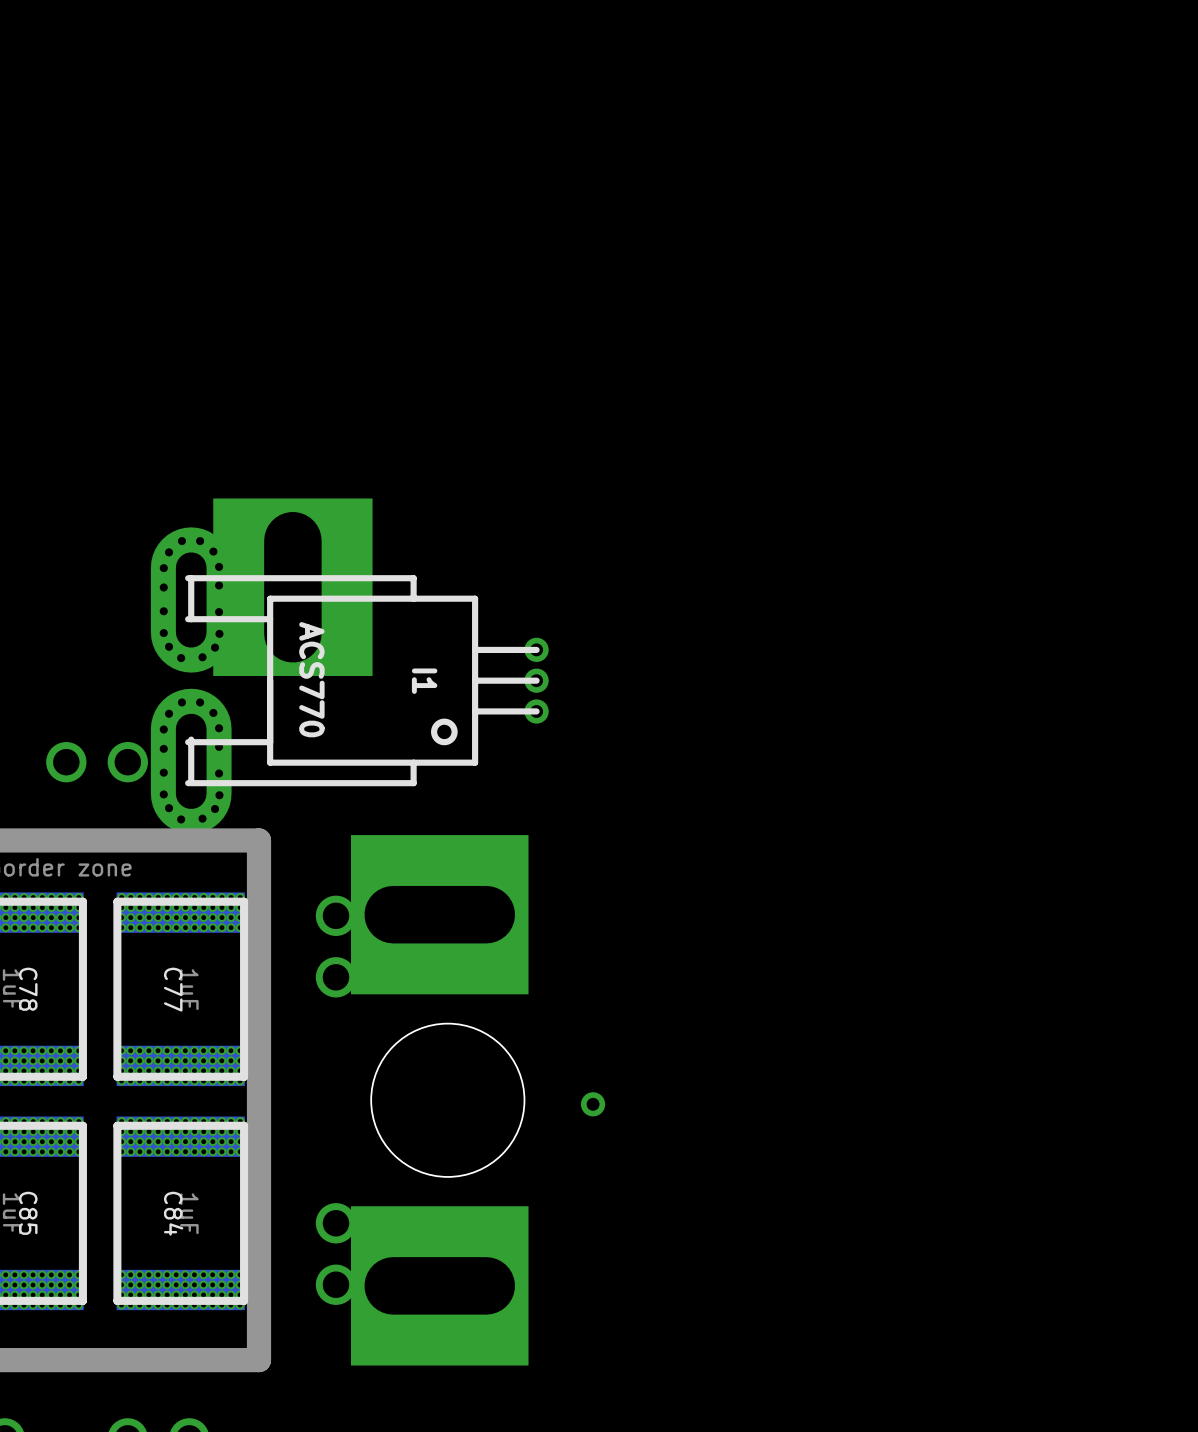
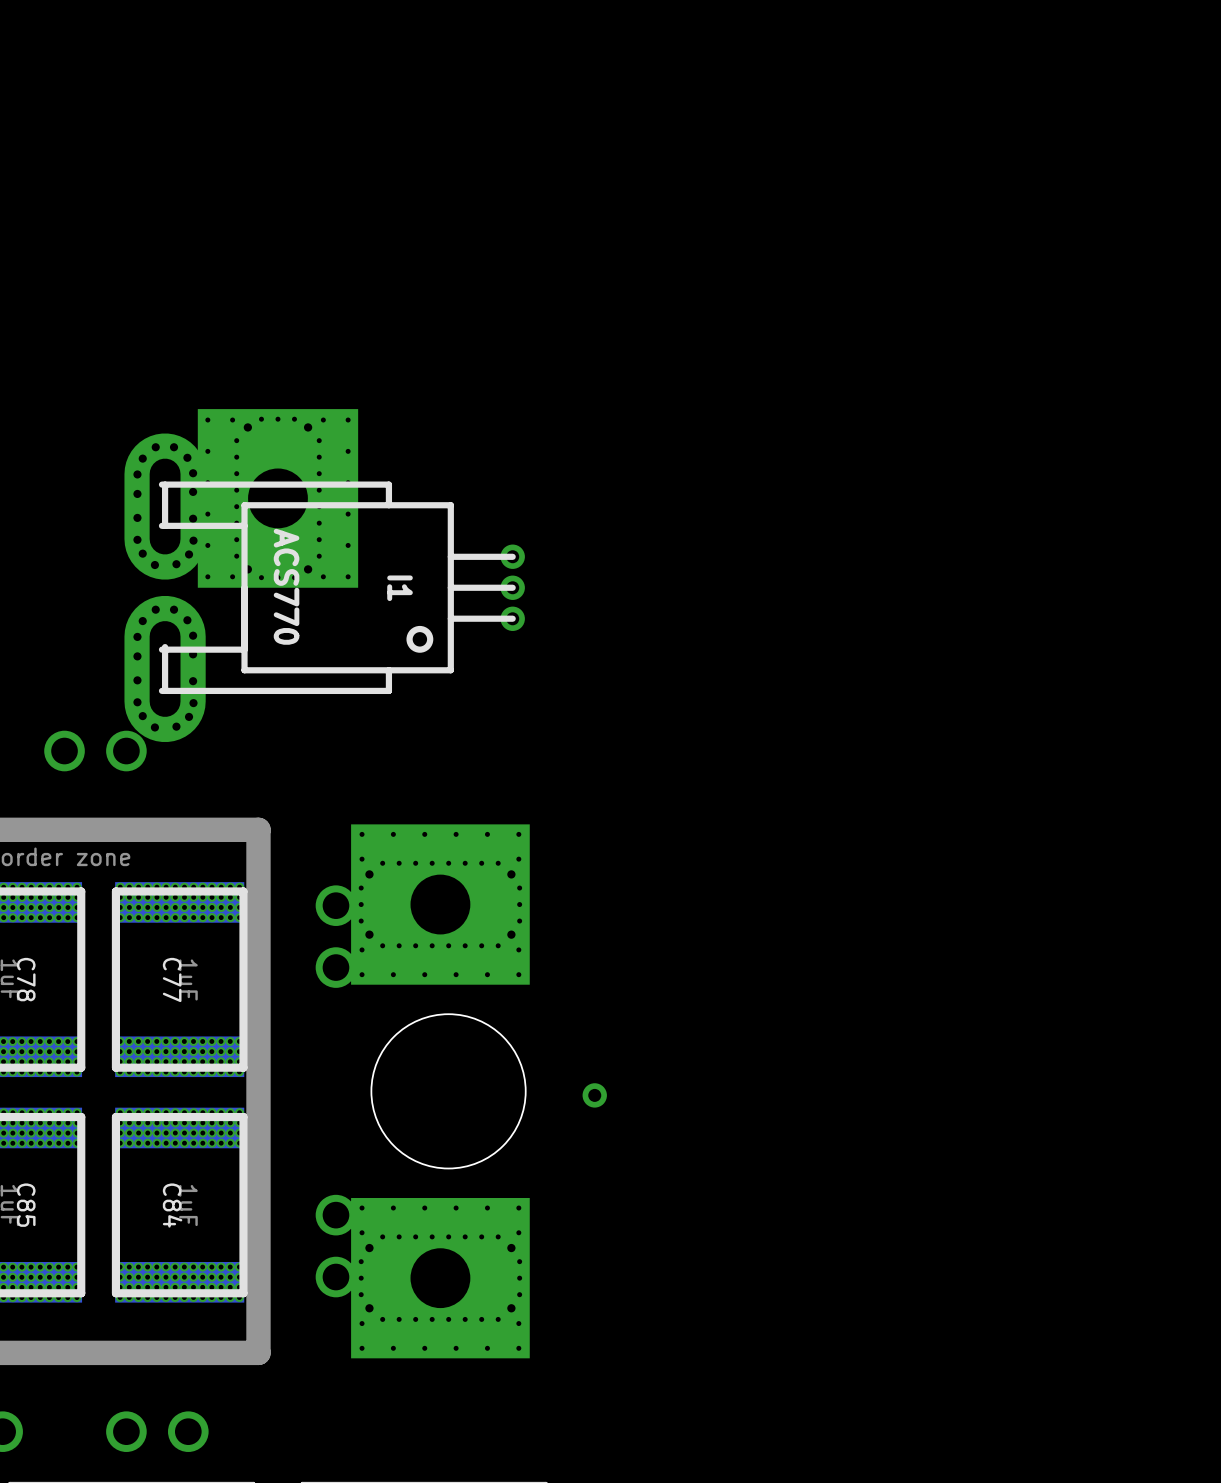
part: none -> (277, 498)
part: (292, 587) -> none
I1 position: (349, 680) -> (324, 587)
part footprint: [350, 835, 529, 995] -> [351, 824, 530, 985]
part footprint: [350, 1206, 529, 1366] -> [351, 1197, 530, 1359]

